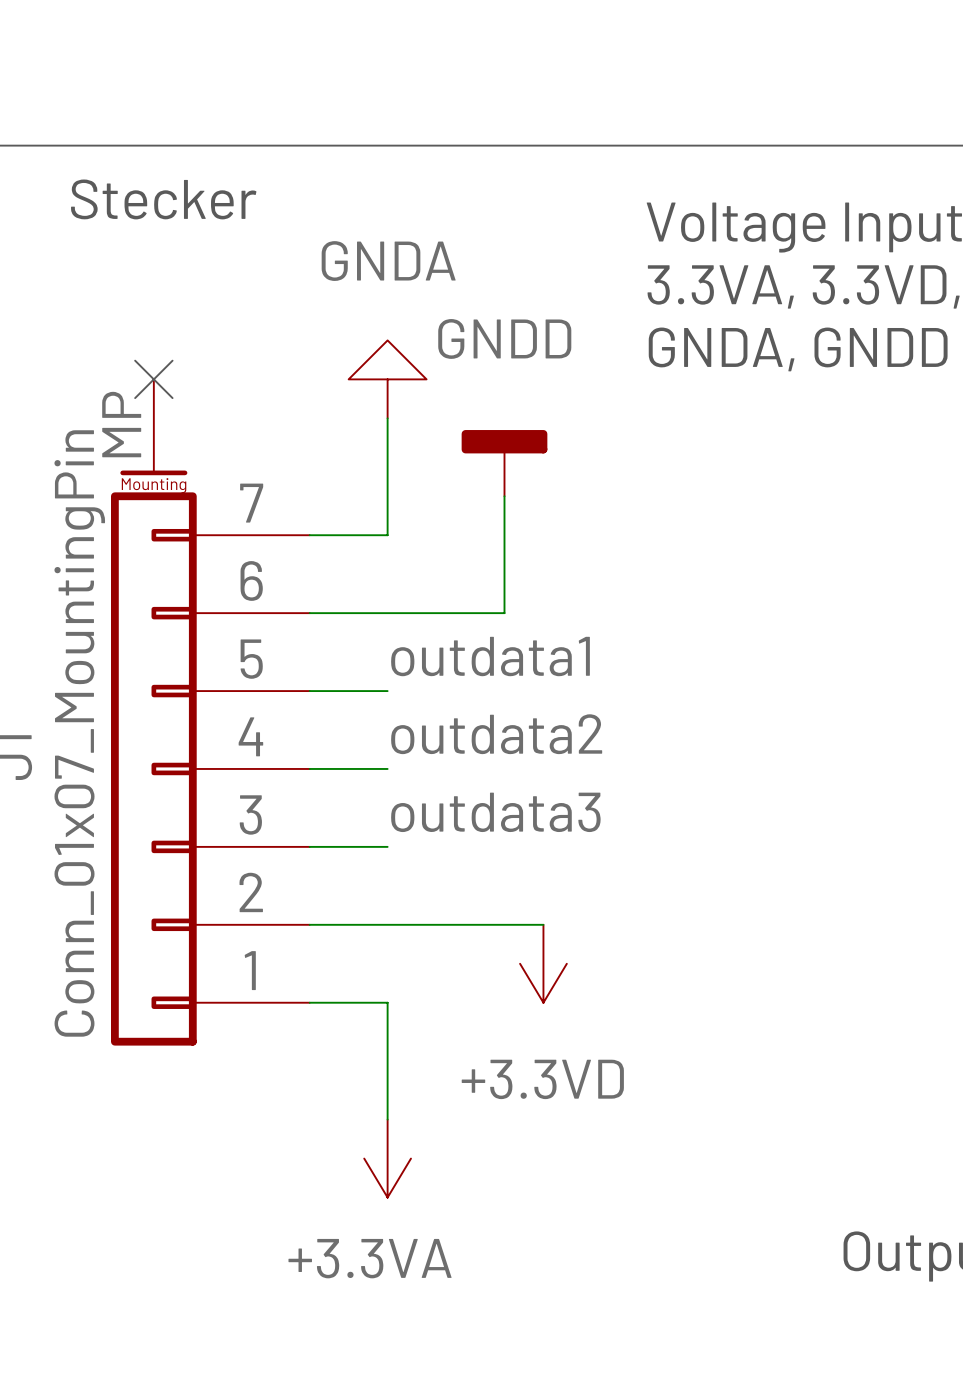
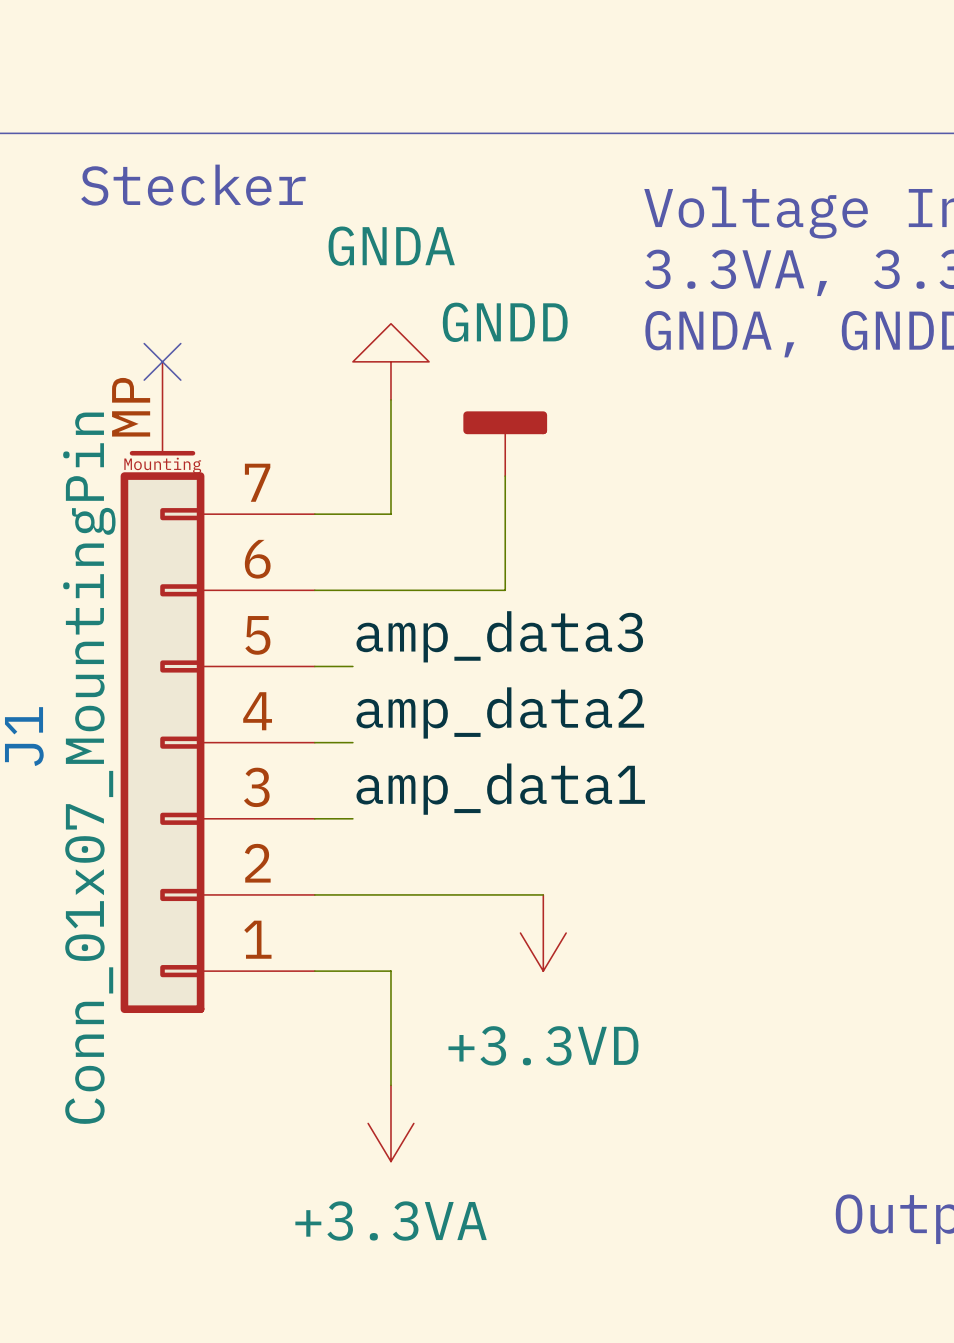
label: outdata1 (490, 656) -> none
label: none -> amp_data3 (499, 636)
wire: (348, 691) (387, 691) -> none
label: outdata2 (496, 734) -> none
label: none -> amp_data2 (500, 712)
wire: (348, 768) (387, 768) -> none
label: outdata3 (495, 812) -> none
label: none -> amp_data1 (500, 789)
wire: (348, 846) (387, 846) -> none

